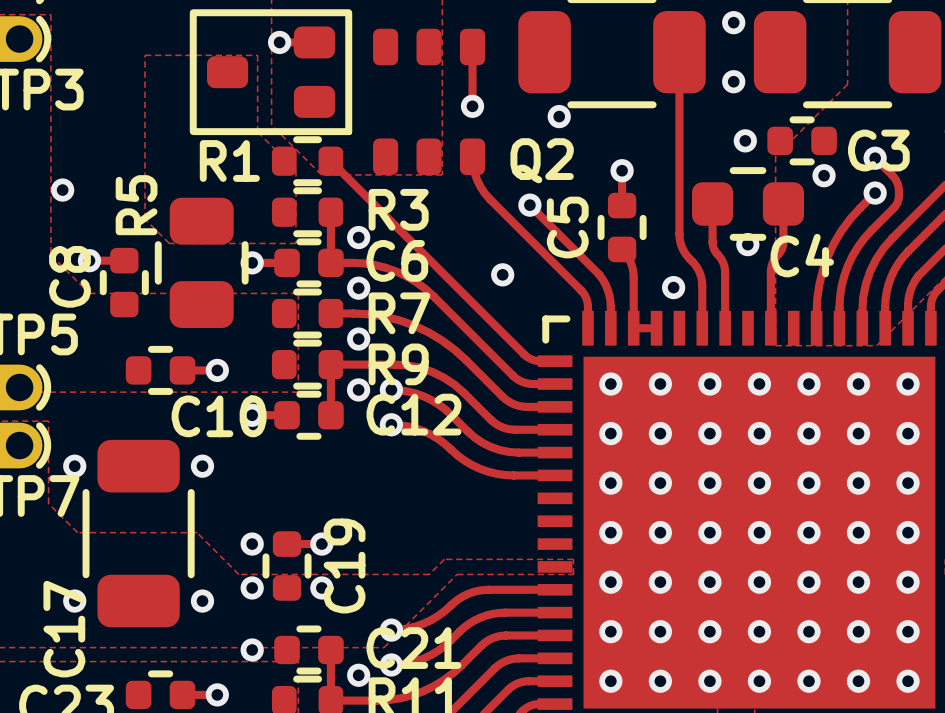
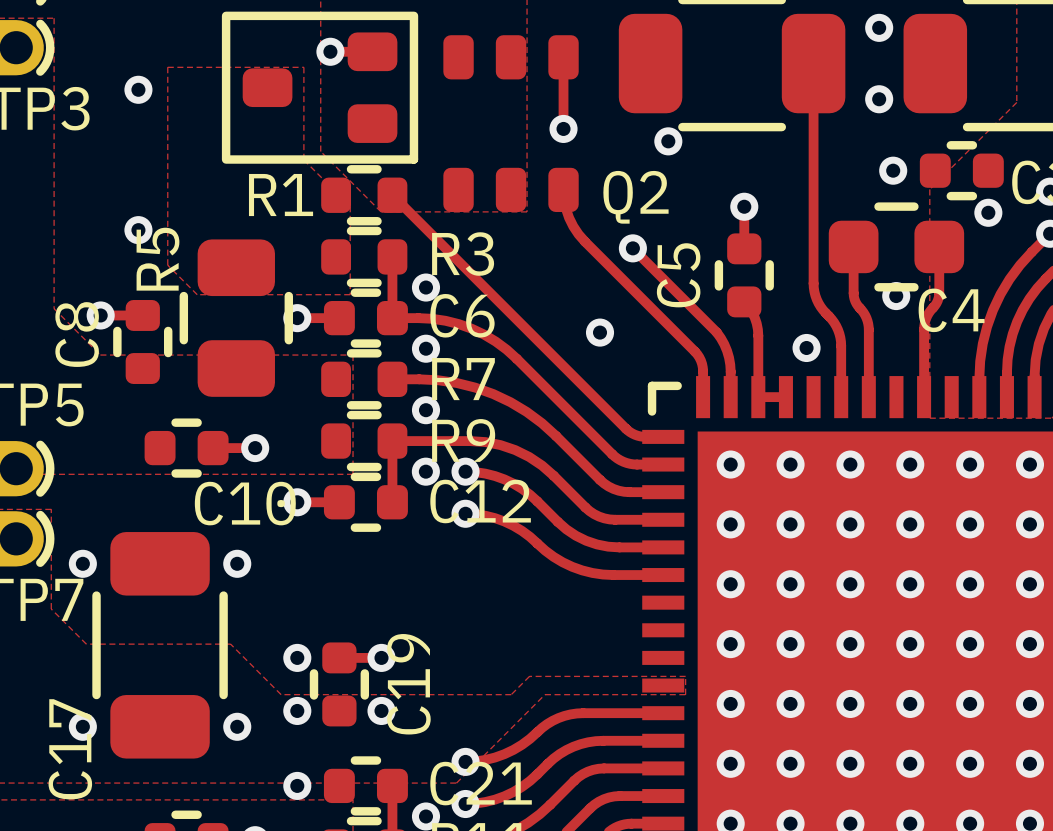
via: none -> (138, 89)
via position: (62, 190) -> (138, 230)

